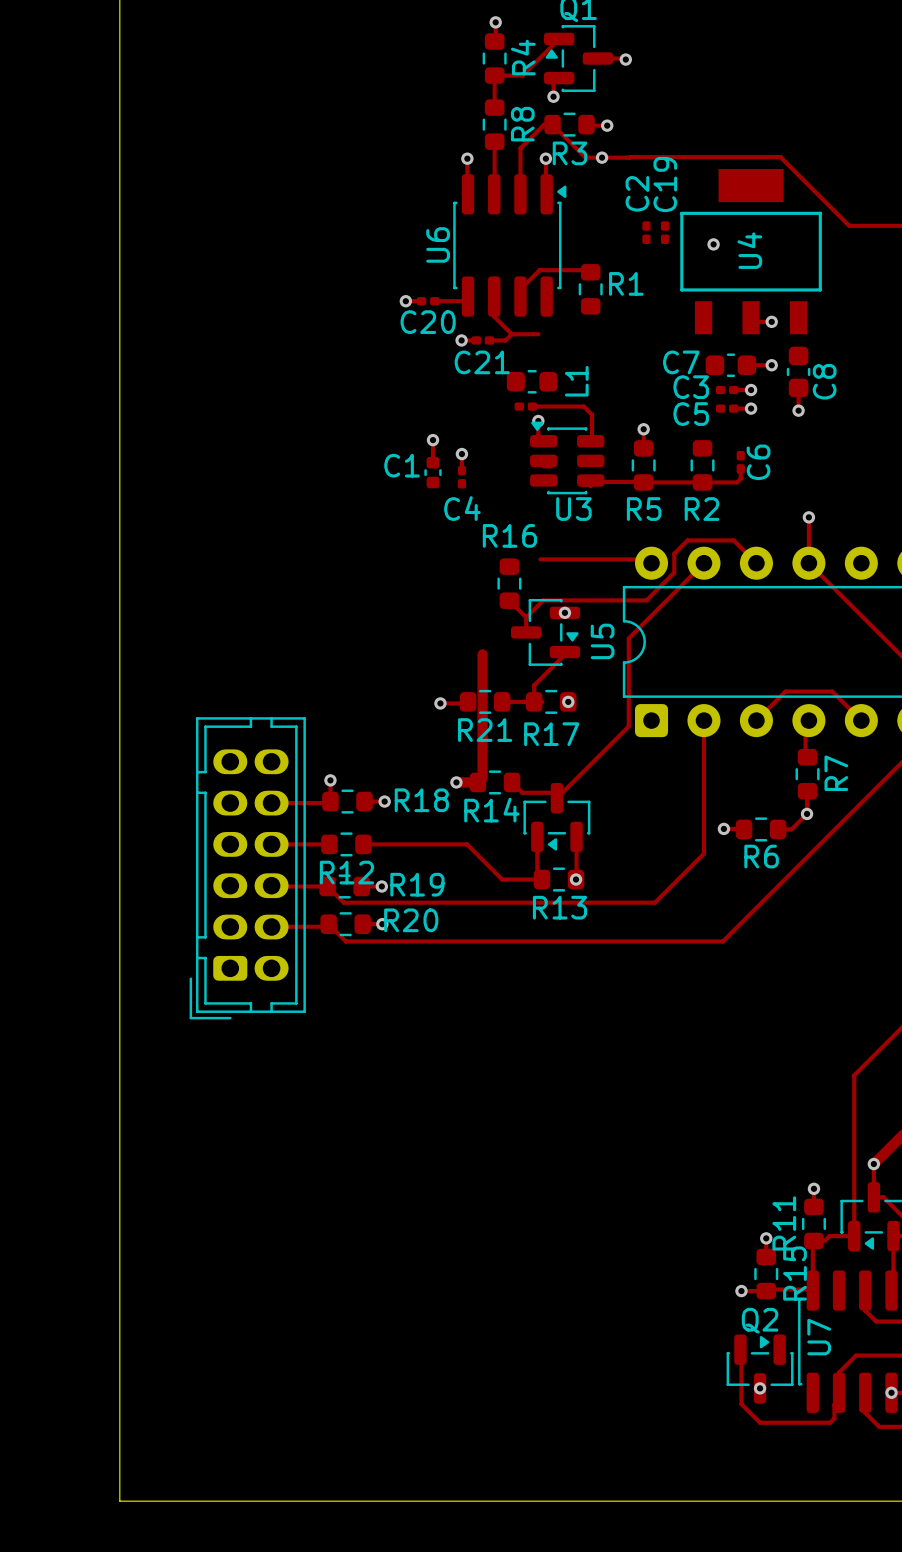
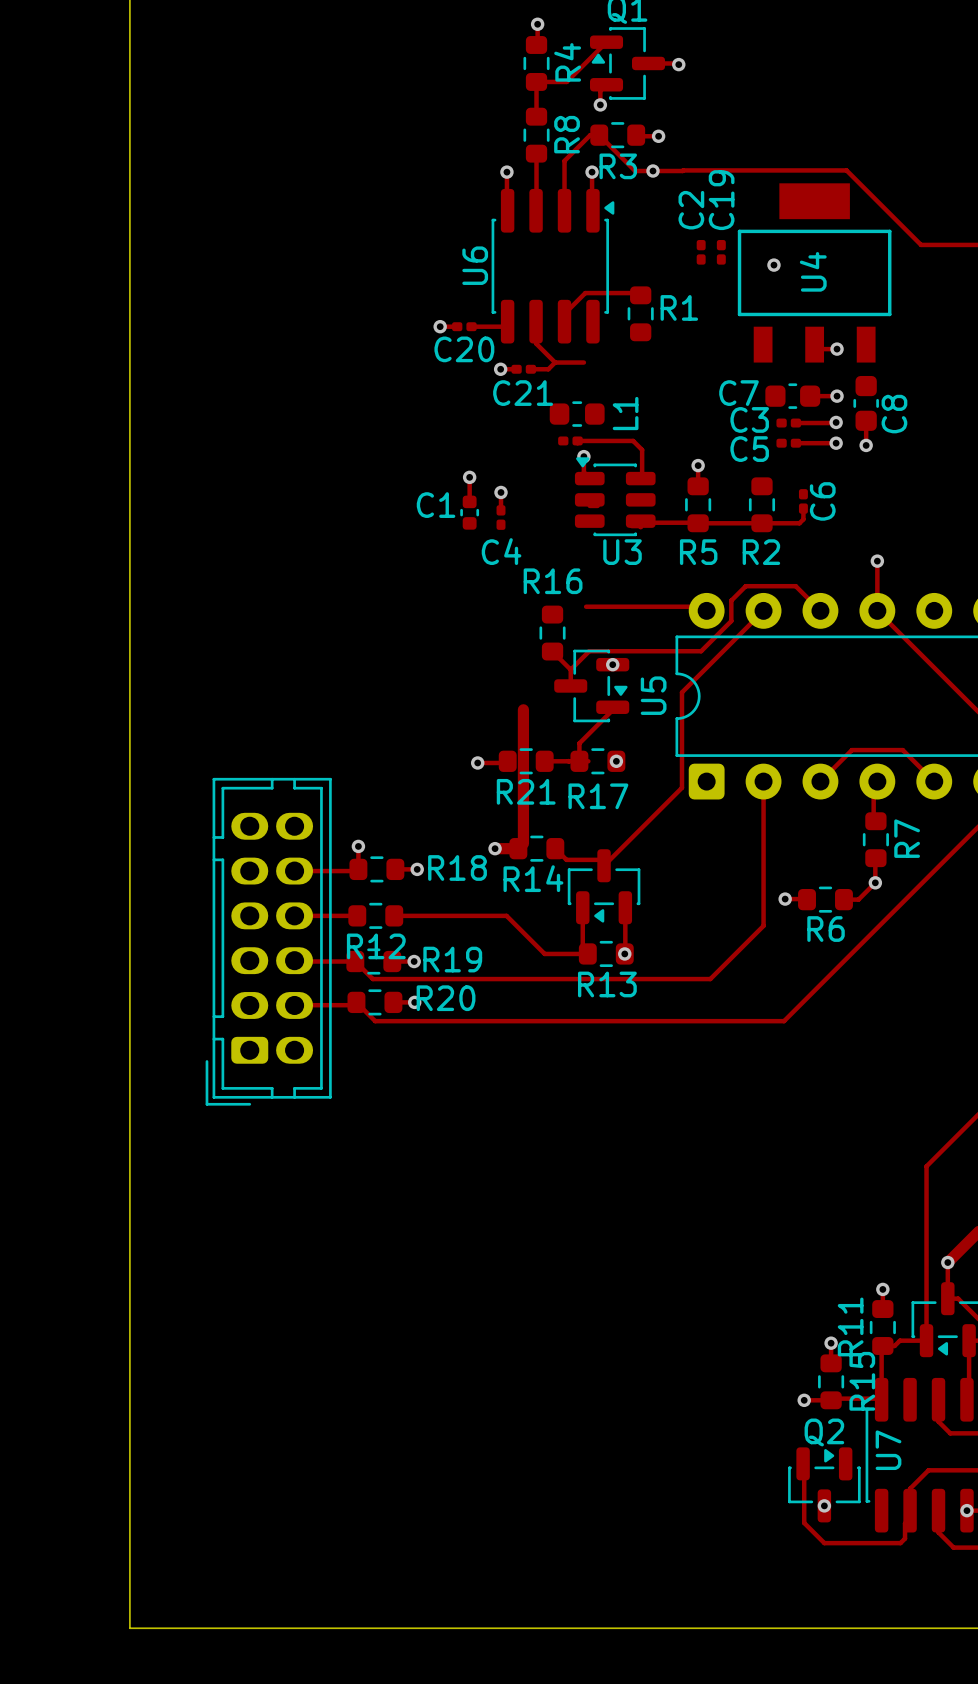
track: none -> (836, 422) (814, 423)
via: none -> (836, 422)
via: (751, 390) -> none
track: none -> (814, 443) (836, 443)
via: (751, 408) -> none
via: none -> (836, 443)

